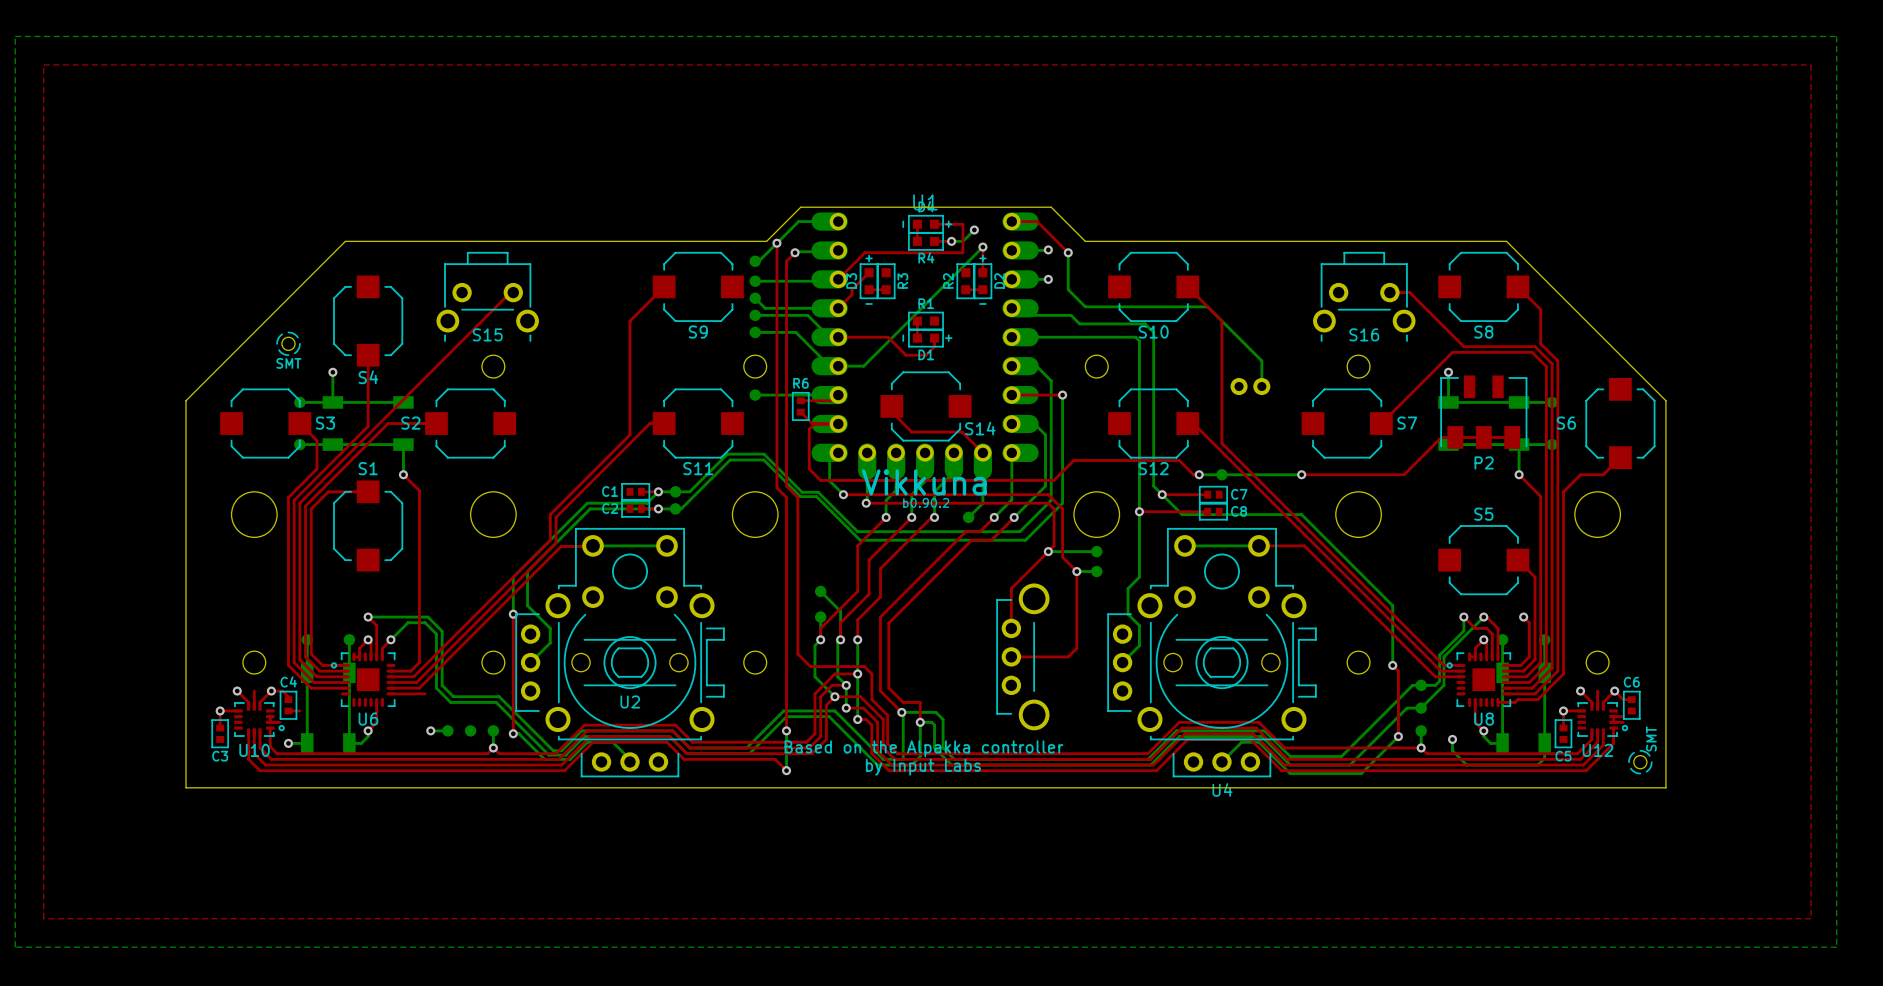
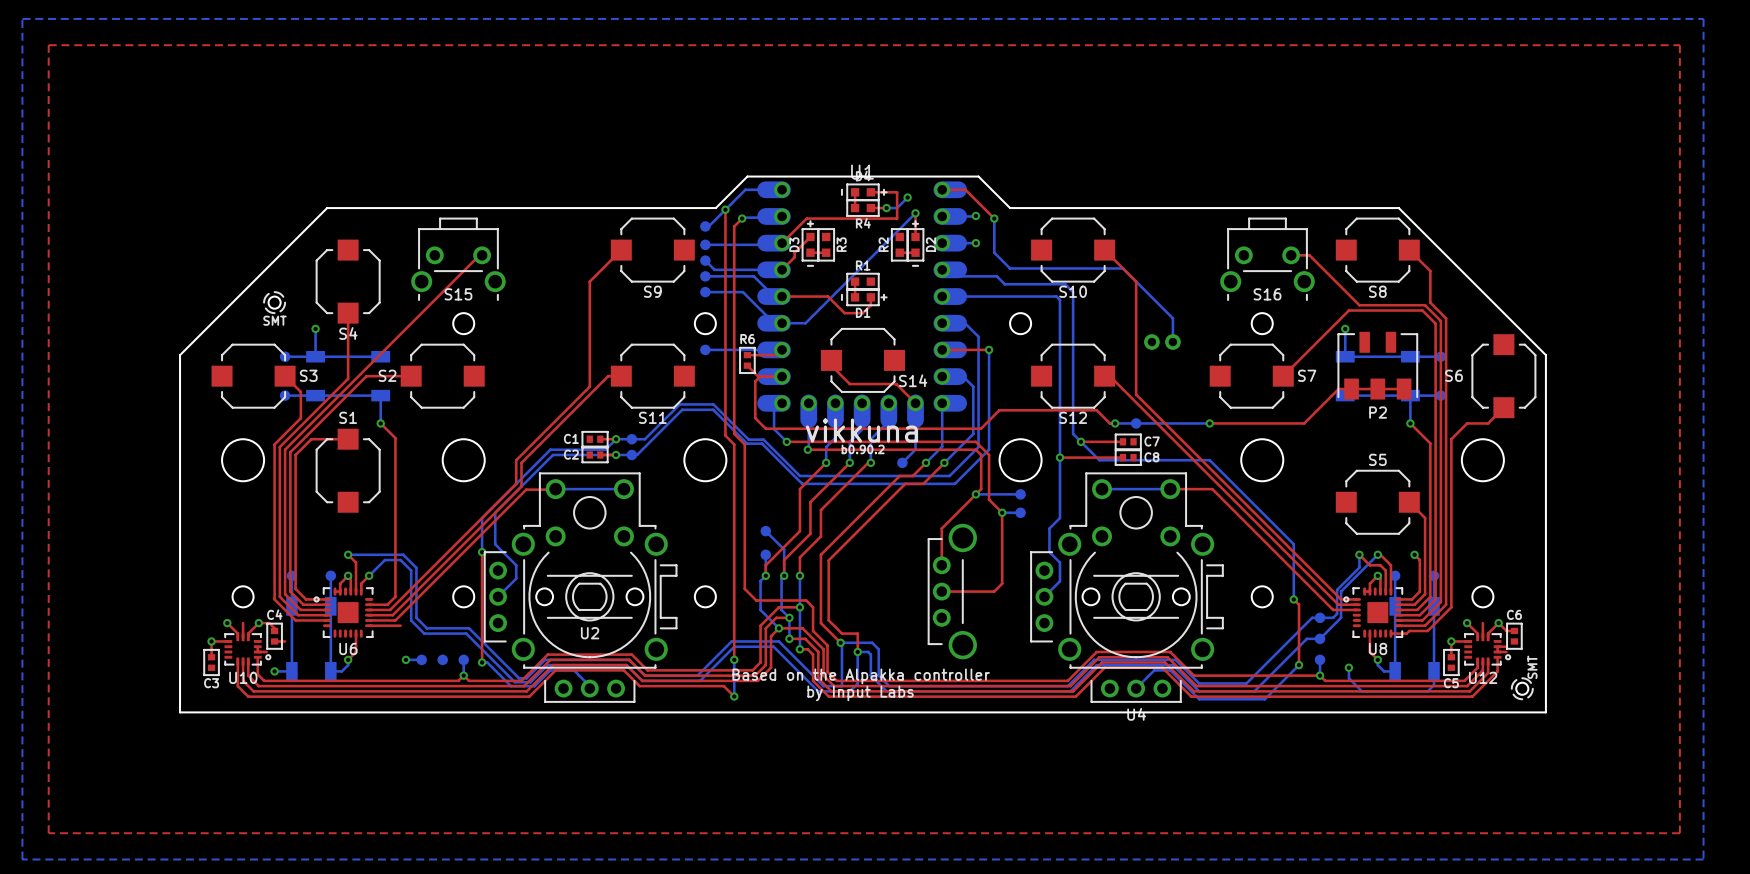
text: Vikkuna (924, 482) -> vikkuna (861, 430)

